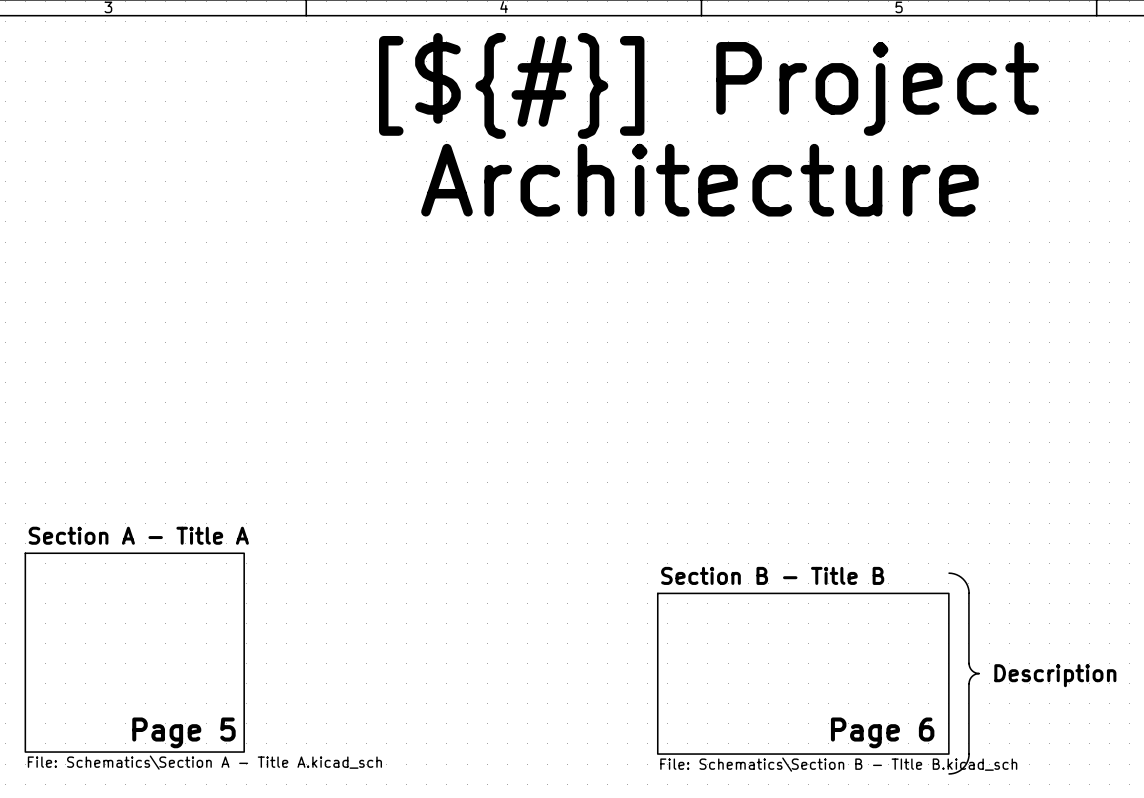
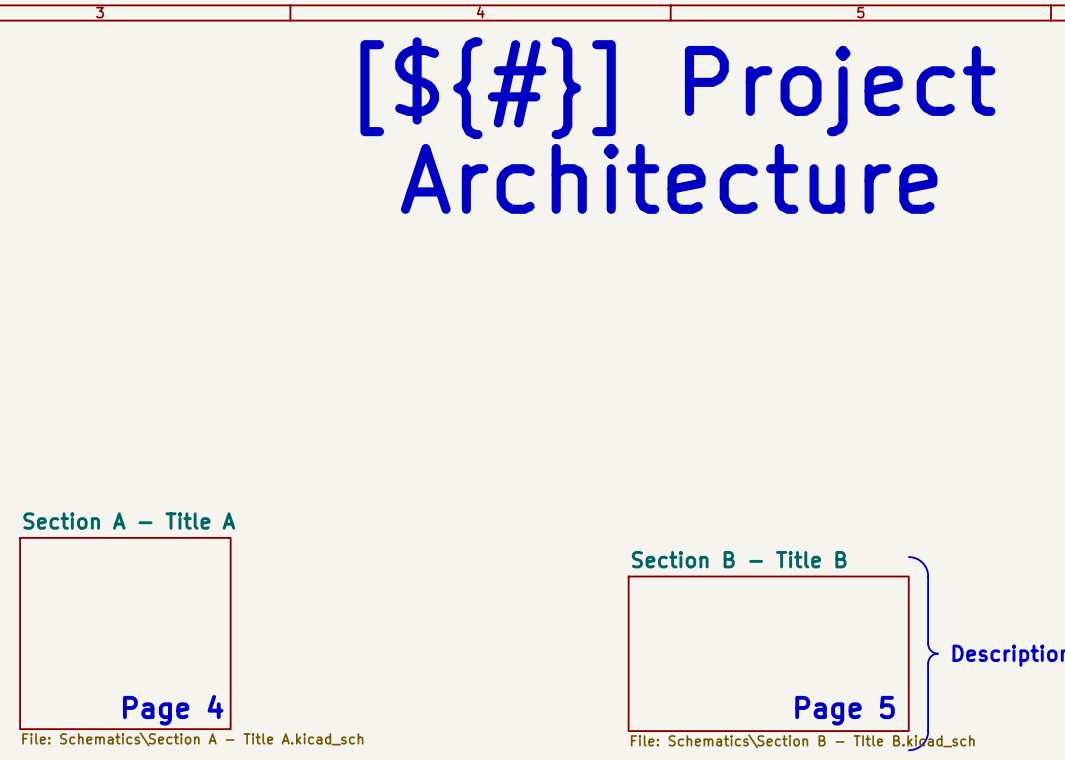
text: Page 5 (183, 732) -> Page 4 (173, 710)
text: Page 6 (882, 732) -> Page 5 (845, 710)

